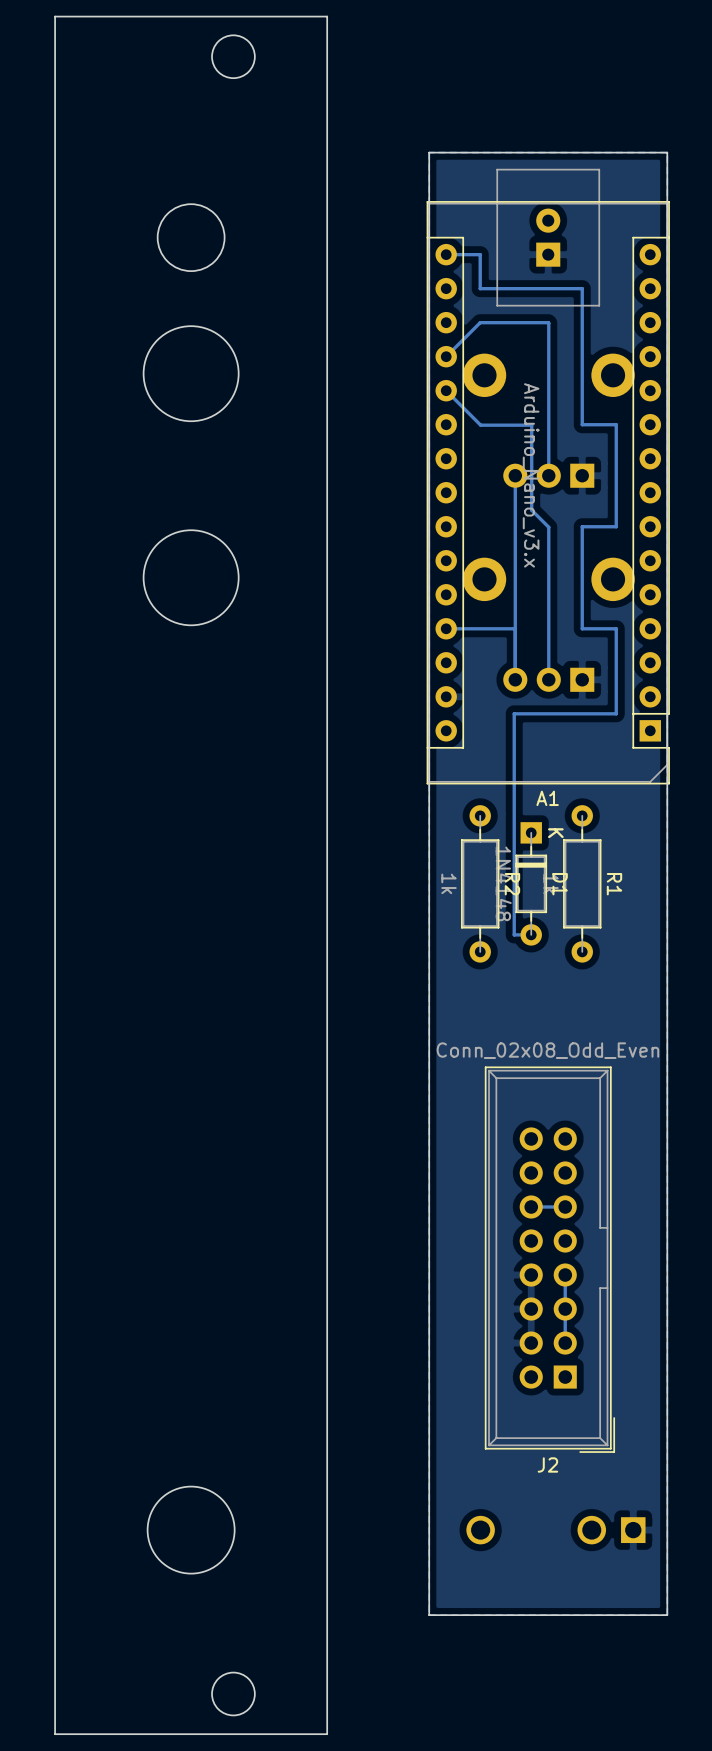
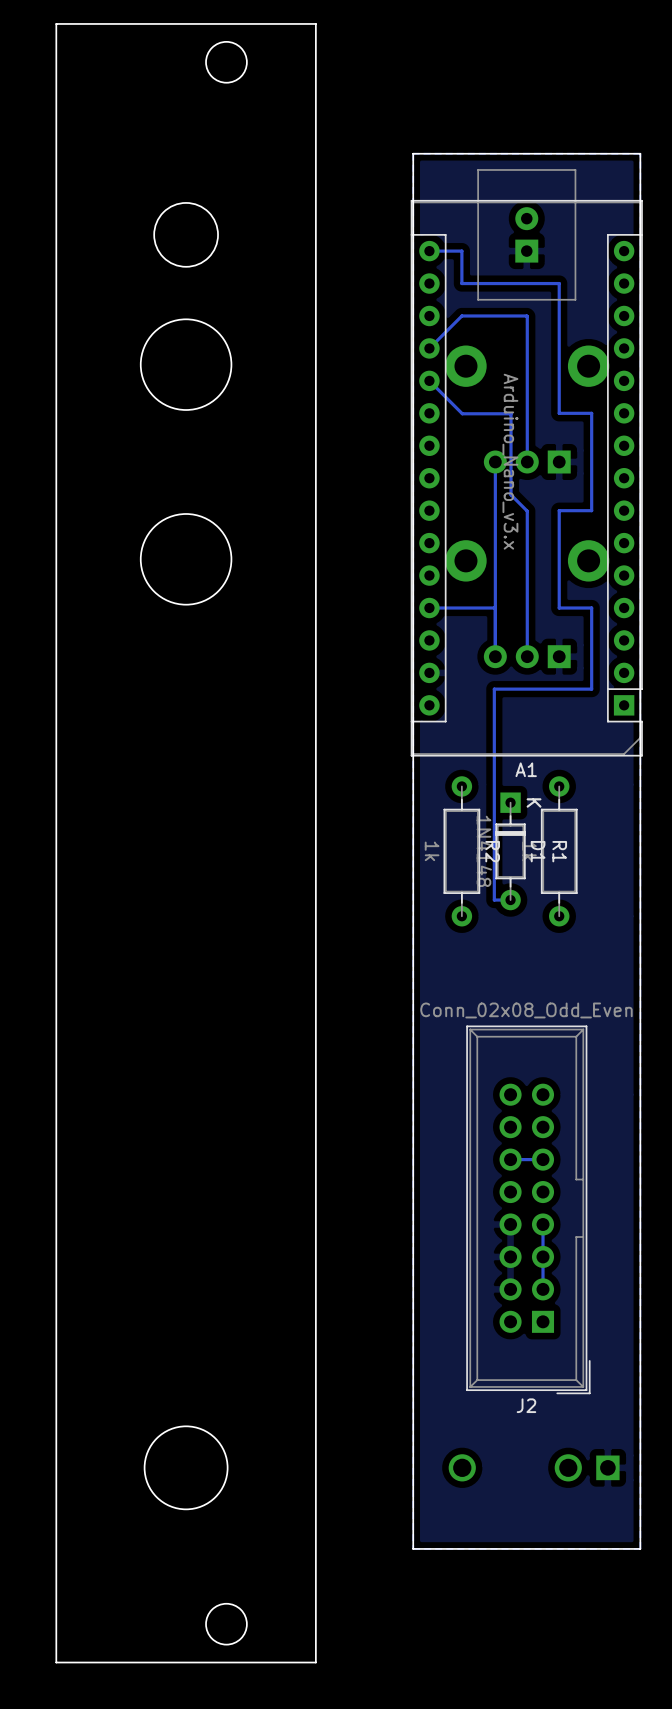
R1 name position: R1 (614, 884) -> R1 (559, 851)

